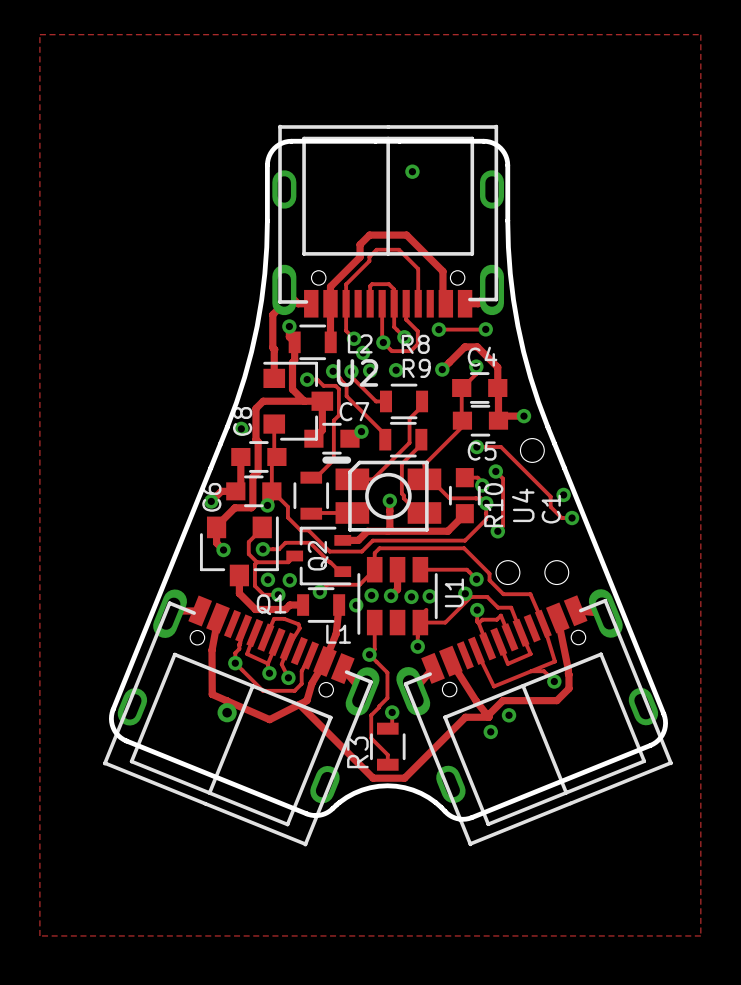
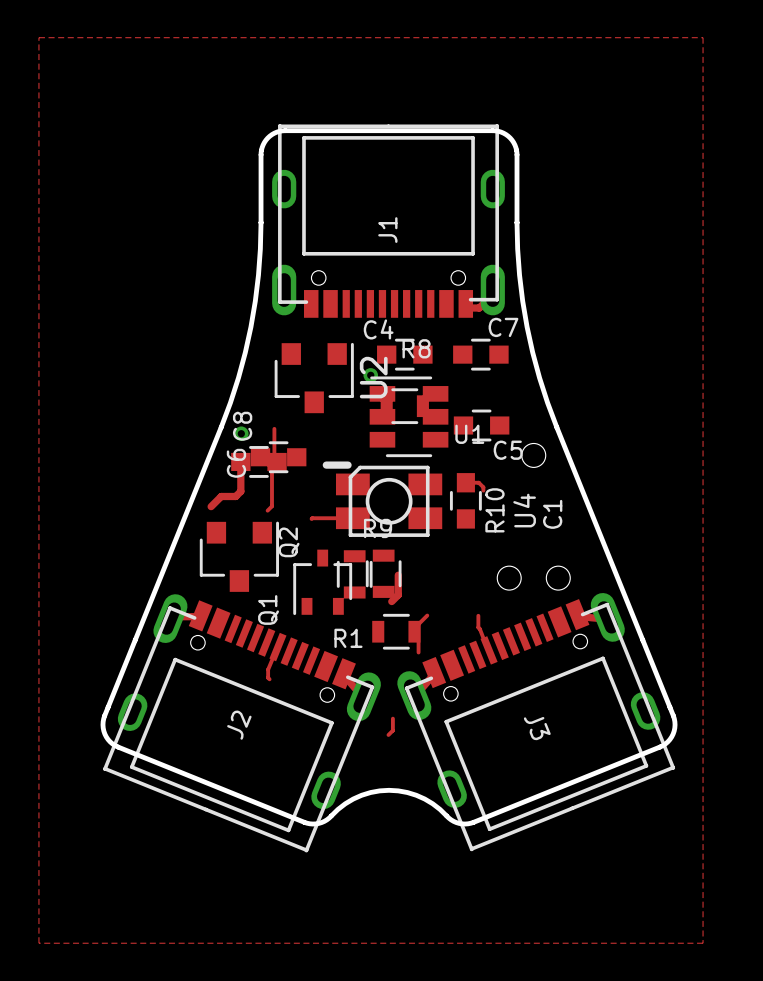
via: (412, 171) -> none
J1: none -> (388, 220)
board edge: none -> (261, 222) (262, 147) (269, 136) (285, 130) (501, 132) (512, 140) (516, 150) (517, 222)
board edge: none -> (261, 222) (255, 301) (238, 377) (221, 427) (104, 715) (103, 728) (108, 739) (118, 747) (304, 822) (312, 824) (324, 821) (345, 803) (361, 795) (389, 790) (416, 795) (432, 803) (453, 821) (462, 823) (470, 823) (659, 747) (667, 741) (674, 731) (673, 715) (556, 427) (539, 377) (522, 301) (517, 222)
board edge: (267, 220) (268, 159) (276, 146) (291, 141) (483, 141) (492, 143) (502, 150) (507, 162) (507, 220) -> none
board edge: (267, 220) (261, 299) (244, 377) (227, 427) (113, 709) (112, 725) (116, 733) (126, 740) (308, 814) (324, 813) (354, 793) (370, 787) (387, 785) (404, 787) (421, 793) (435, 802) (449, 815) (462, 819) (471, 817) (650, 745) (660, 737) (665, 726) (663, 714) (547, 427) (530, 377) (513, 299) (507, 220) -> none
part: (388, 221) -> none
track: (311, 303) (298, 303) (284, 289) (284, 303) (272, 314) (274, 378) -> none
track: (370, 303) (370, 286) (372, 284) (388, 284) (394, 289) (394, 327) (404, 337) -> none
track: (382, 303) (382, 341) (391, 351) (410, 351) (417, 344) (417, 331) (406, 319) (406, 303) -> none
track: (418, 303) (418, 268) (399, 249) (376, 249) (369, 256) (369, 261) (346, 284) (346, 330) (354, 338) -> none
track: (445, 303) (442, 300) (442, 271) (406, 235) (369, 235) (360, 244) (360, 257) (330, 286) (330, 342) -> none
track: (289, 326) (289, 337) (294, 342) (292, 389) (304, 401) -> none
via: (289, 326) -> none
track: (438, 329) (485, 329) -> none
via: (438, 329) -> none
via: (485, 329) -> none
via: (404, 337) -> none
via: (354, 338) -> none
L2: (312, 342) -> none
via: (383, 342) -> none
via: (363, 352) -> none
C4 name position: C4 (482, 356) -> C4 (378, 329)
track: (476, 366) (476, 373) (461, 388) (462, 426) (424, 464) (424, 479) (430, 479) (449, 498) (475, 498) -> none
via: (476, 366) -> none
track: (442, 369) (464, 346) (477, 346) (497, 367) (498, 420) (503, 416) (523, 416) -> none
via: (442, 369) -> none
via: (396, 370) -> none
track: (333, 371) (346, 385) (346, 396) (385, 434) (385, 439) -> none
via: (333, 371) -> none
track: (351, 371) (351, 376) (376, 401) (386, 401) -> none
via: (351, 371) -> none
track: (307, 379) (317, 379) (323, 385) (335, 385) (338, 389) (338, 415) (333, 420) (333, 459) (316, 477) (311, 477) -> none
via: (307, 379) -> none
C4 position: (479, 388) -> (404, 354)
U2 rotation: 0° (298, 401) -> 90° clockwise (314, 378)
track: (422, 401) (422, 406) (409, 418) (409, 442) (373, 479) (352, 479) -> none
via: (523, 416) -> none
via: (361, 431) -> none
track: (313, 438) (322, 430) (322, 401) (263, 401) (255, 408) (258, 471) (252, 477) (252, 506) (234, 507) (216, 526) (216, 543) (223, 549) -> none
C7 position: (331, 438) -> (480, 354)
R9 rotation: 0° (403, 439) -> 90° clockwise (383, 573)
R9 position: (403, 439) -> (383, 573)
track: (421, 439) (421, 444) (401, 463) (401, 493) (403, 498) (418, 512) (424, 512) -> none
track: (476, 447) (501, 447) (550, 496) (550, 506) (561, 518) (572, 518) -> none
via: (476, 447) -> none
C5 name position: C5 (482, 451) -> C5 (508, 450)
track: (495, 471) (503, 478) (503, 526) (497, 531) -> none
via: (495, 471) -> none
via: (482, 485) -> none
C6 position: (253, 491) -> (278, 457)
track: (271, 491) (287, 506) (287, 517) (300, 530) (308, 530) (329, 551) (361, 551) (372, 540) (465, 540) (486, 519) (486, 503) (481, 498) (476, 498) -> none
via: (563, 494) -> none
R10 position: (311, 495) -> (354, 574)
track: (389, 500) (389, 529) (387, 531) -> none
via: (389, 500) -> none
via: (211, 501) -> none
via: (486, 503) -> none
via: (267, 505) -> none
track: (464, 513) (447, 531) (367, 531) (358, 540) (342, 540) -> none
via: (572, 518) -> none
track: (262, 527) (248, 542) (248, 554) (257, 562) -> none
via: (497, 531) -> none
via: (223, 549) -> none
track: (262, 549) (279, 549) (285, 542) (310, 542) (339, 571) (342, 571) -> none
via: (262, 549) -> none
Q2 name position: Q2 (318, 555) -> Q2 (289, 542)
track: (294, 556) (288, 562) (257, 562) -> none
Q2 rotation: 0° (318, 556) -> 90° clockwise (322, 582)
track: (257, 562) (254, 564) (254, 586) (263, 594) (278, 594) -> none
track: (420, 569) (466, 569) (476, 579) -> none
track: (239, 575) (239, 593) (255, 609) (285, 609) (289, 605) (303, 605) -> none
via: (267, 579) -> none
via: (476, 579) -> none
via: (289, 580) -> none
track: (319, 591) (327, 584) (359, 584) (374, 569) (374, 553) (379, 548) (464, 548) (489, 573) (489, 580) (503, 594) (530, 594) (543, 623) (554, 661) (493, 686) (476, 650) -> none
via: (319, 591) -> none
track: (465, 593) (468, 596) (487, 596) (498, 607) (511, 607) (530, 654) (507, 663) (498, 641) -> none
via: (465, 593) -> none
via: (278, 594) -> none
via: (371, 595) -> none
via: (391, 595) -> none
U1 rotation: 0° (397, 596) -> 90° clockwise (409, 416)
U1 position: (397, 596) -> (409, 416)
via: (411, 596) -> none
via: (429, 596) -> none
track: (470, 596) (445, 622) (420, 622) -> none
Q1 name rotation: 0° (271, 604) -> 90° counterclockwise (268, 609)
L1: (321, 605) -> none
via: (356, 605) -> none
track: (339, 609) (339, 605) (336, 633) (324, 661) (311, 683) (306, 700) (269, 719) (212, 694) (212, 650) (218, 618) -> none
via: (477, 610) -> none
track: (557, 617) (568, 669) (568, 688) (556, 700) (502, 700) (488, 714) (488, 717) -> none
track: (374, 622) (374, 649) (369, 654) (387, 672) (387, 698) (371, 715) (371, 738) (387, 754) (387, 764) -> none
track: (478, 623) (482, 619) (496, 619) (500, 615) (509, 637) -> none
R1: none -> (396, 631)
track: (254, 633) (247, 654) (268, 663) -> none
track: (265, 637) (274, 618) (284, 618) (298, 624) (299, 628) (288, 646) (281, 664) (288, 677) -> none
track: (240, 643) (239, 648) (235, 652) (235, 663) (262, 690) (294, 690) (301, 683) (301, 671) (310, 655) -> none
via: (417, 646) -> none
via: (369, 654) -> none
track: (450, 661) (488, 717) -> none
via: (235, 663) -> none
track: (531, 671) (544, 671) (554, 681) -> none
via: (269, 673) -> none
via: (288, 677) -> none
via: (554, 681) -> none
track: (299, 704) (373, 778) (404, 778) (465, 717) (488, 717) -> none
via: (227, 712) -> none
via: (392, 712) -> none
via: (509, 715) -> none
J3: none -> (536, 722)
part: (241, 717) -> none
J2: none -> (242, 723)
part: (534, 717) -> none
via: (490, 731) -> none
R3: (387, 746) -> none

